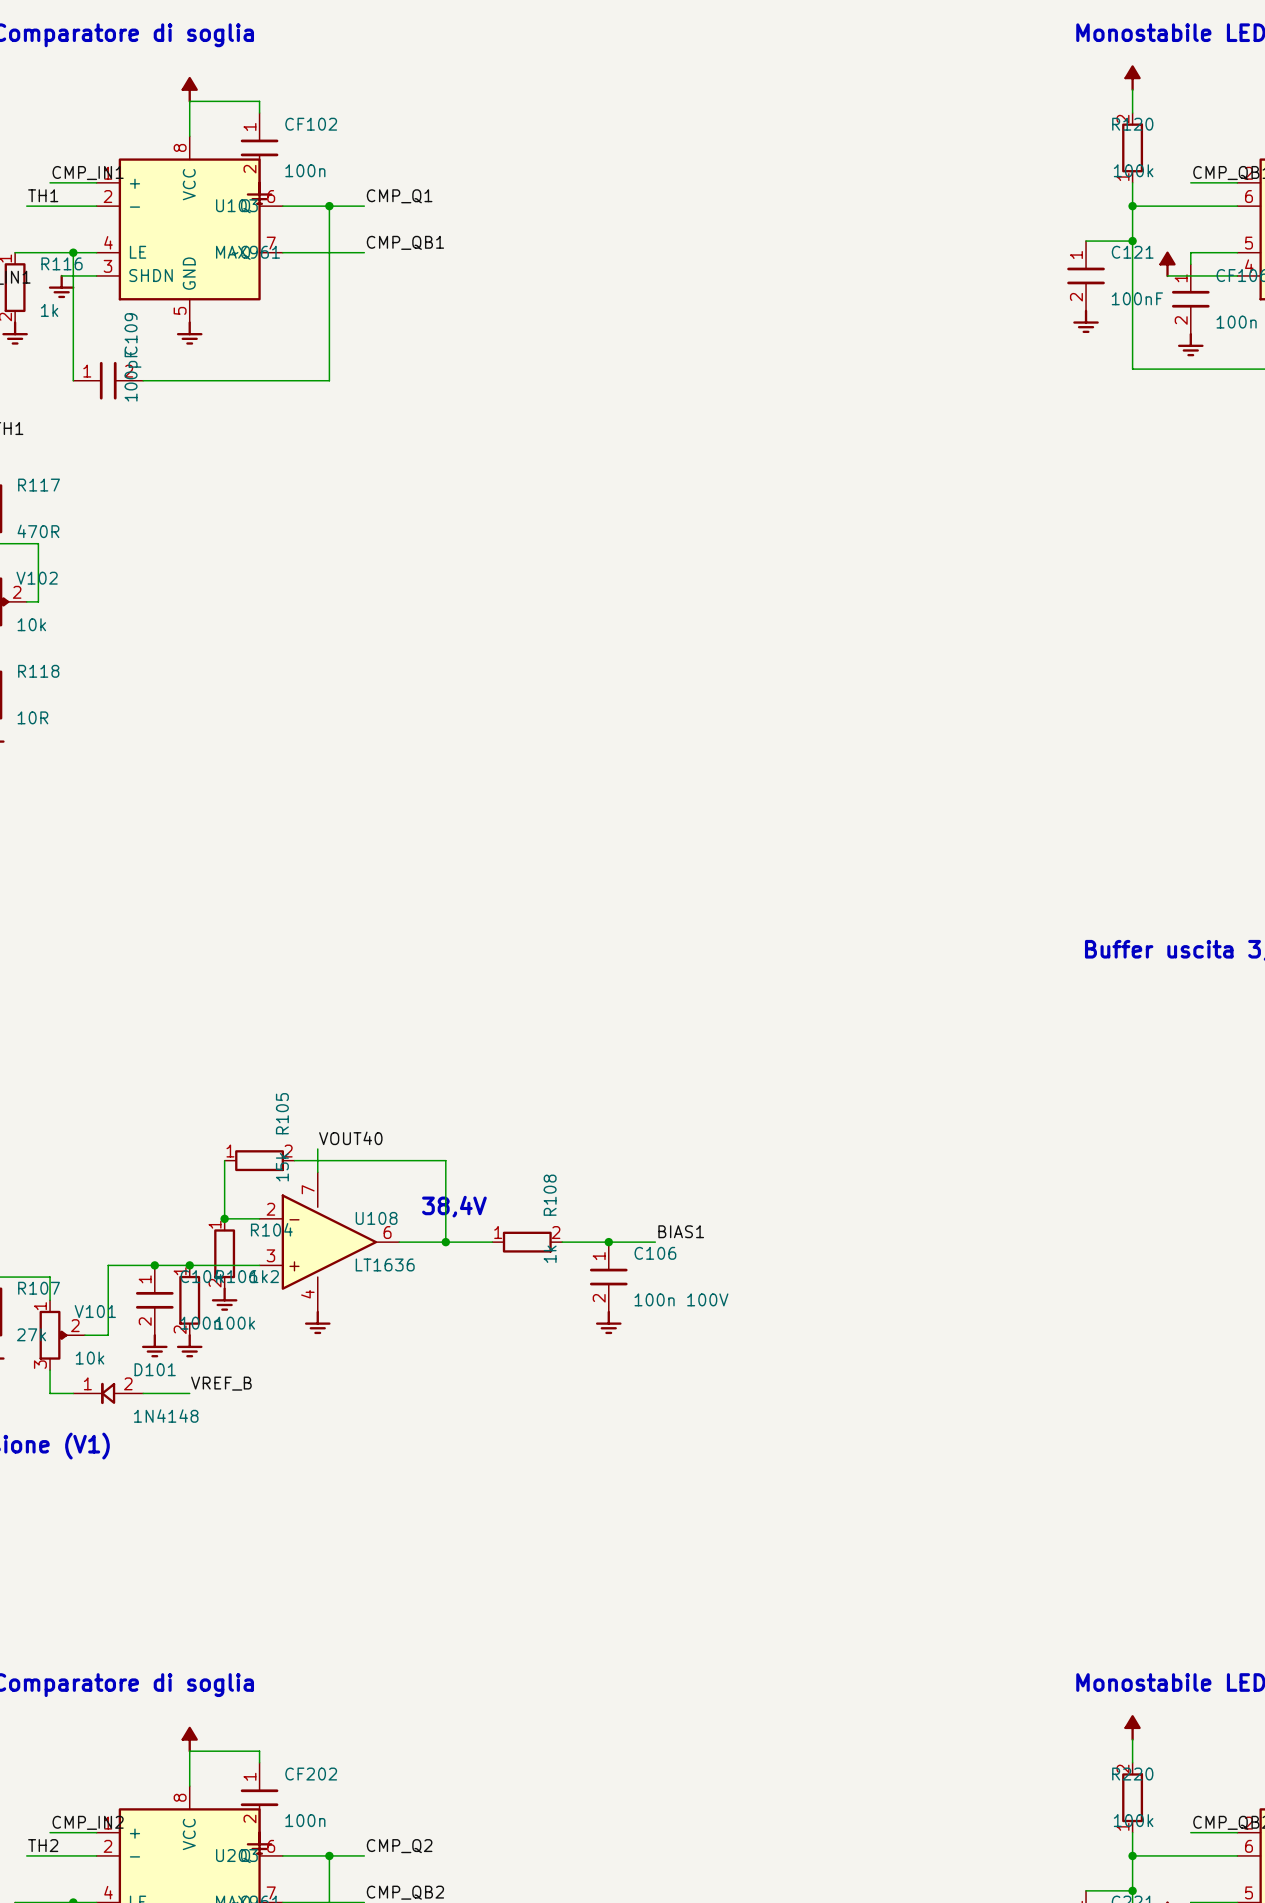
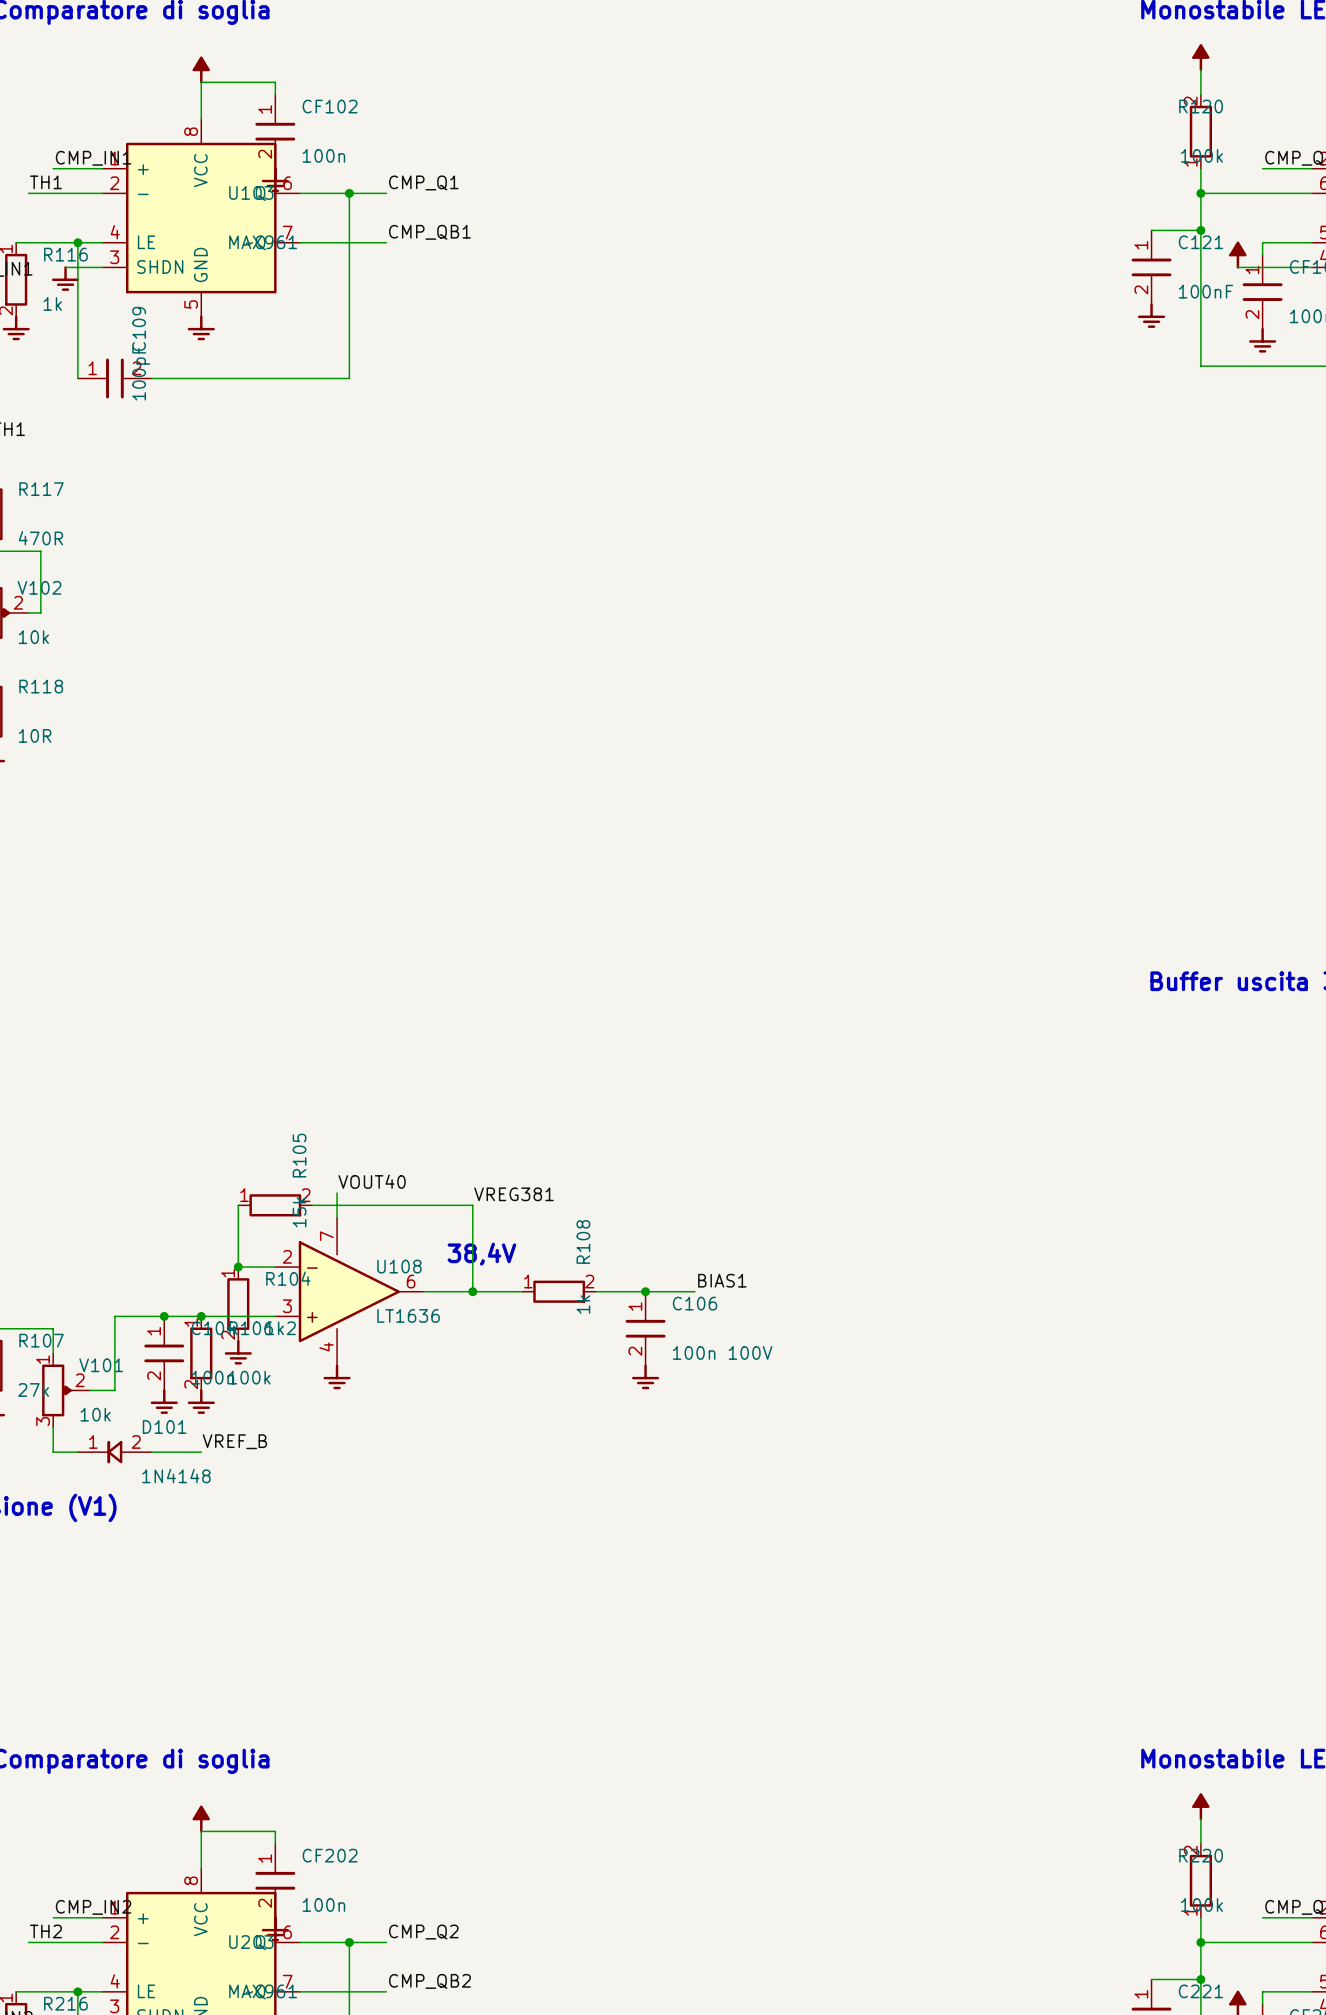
label: none -> VREG381 (514, 1194)

